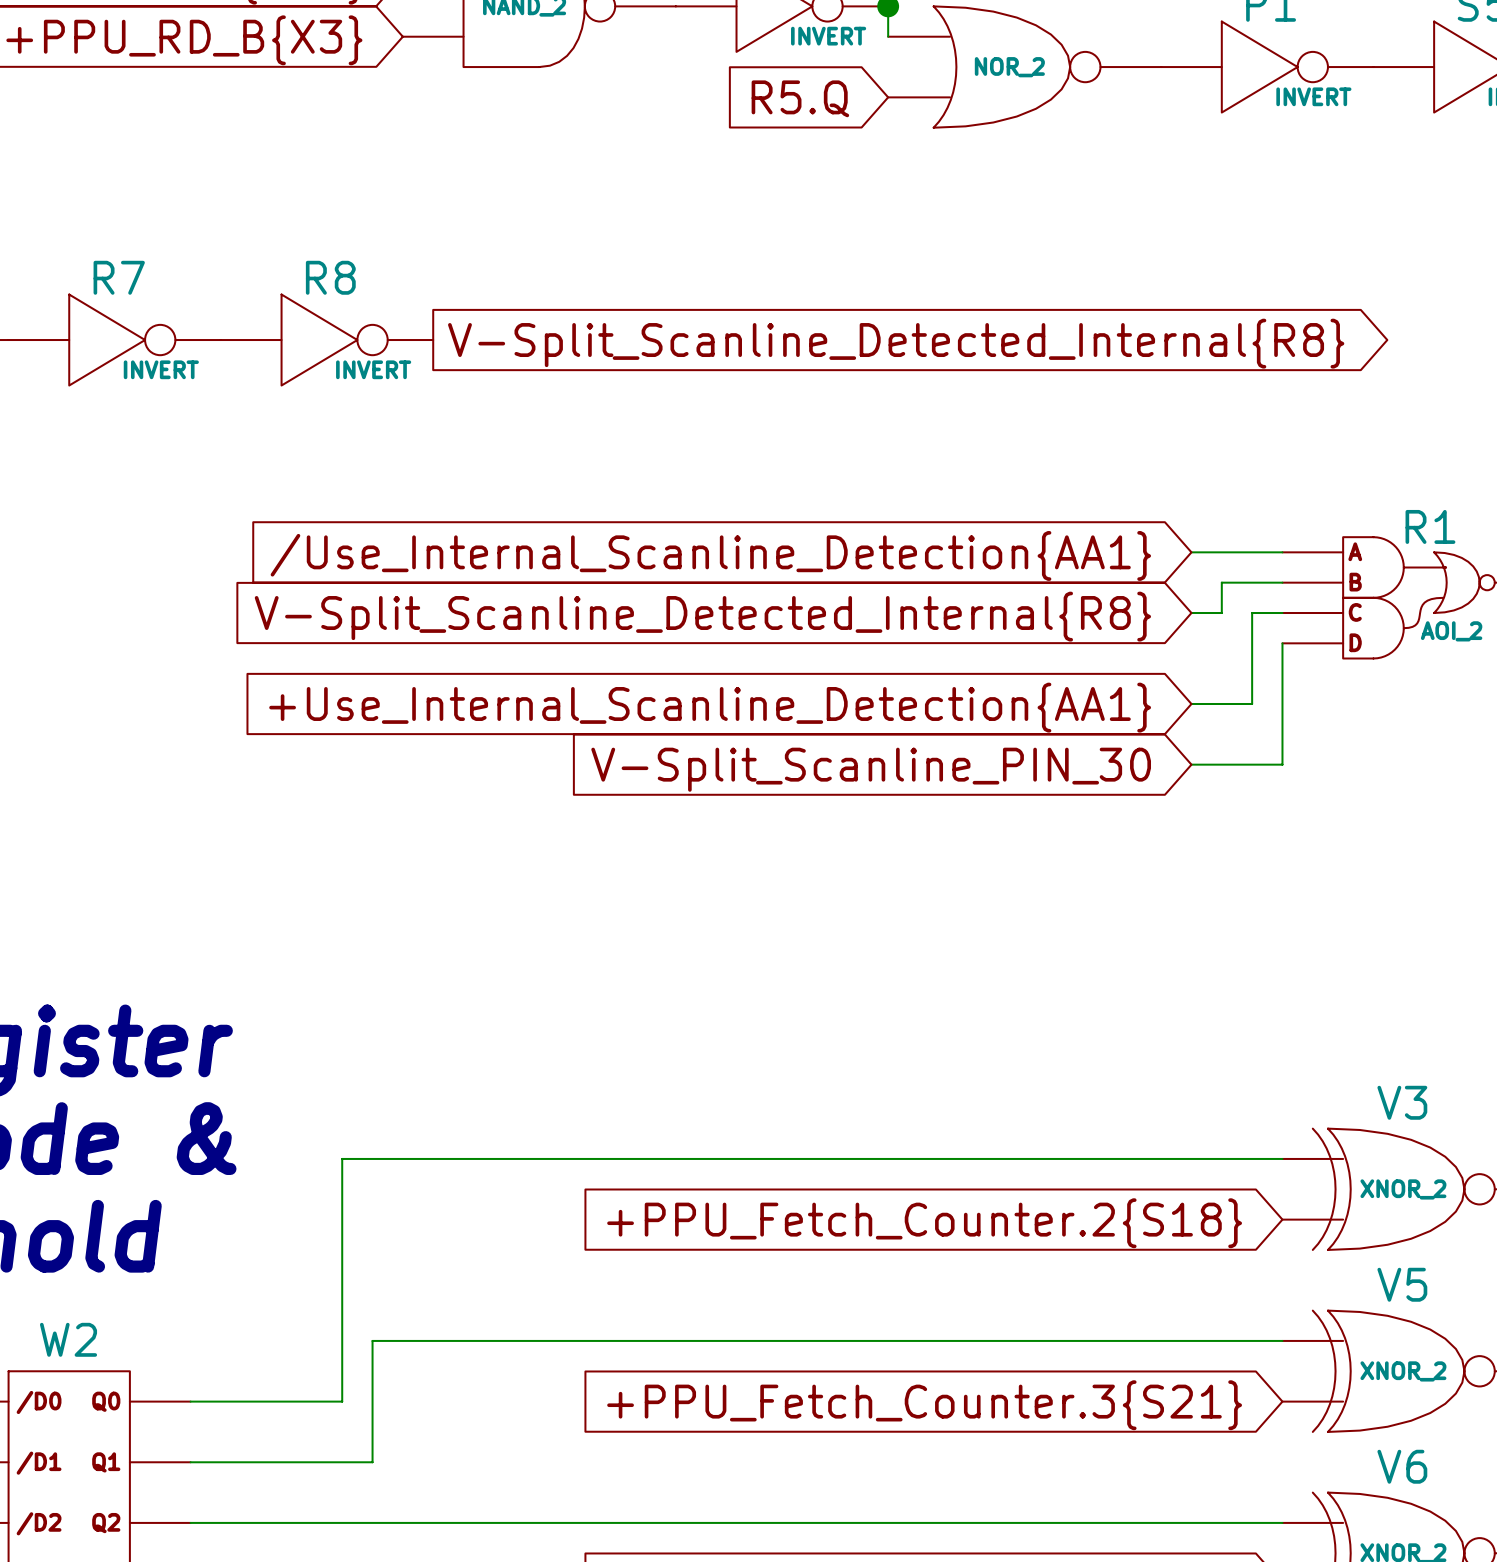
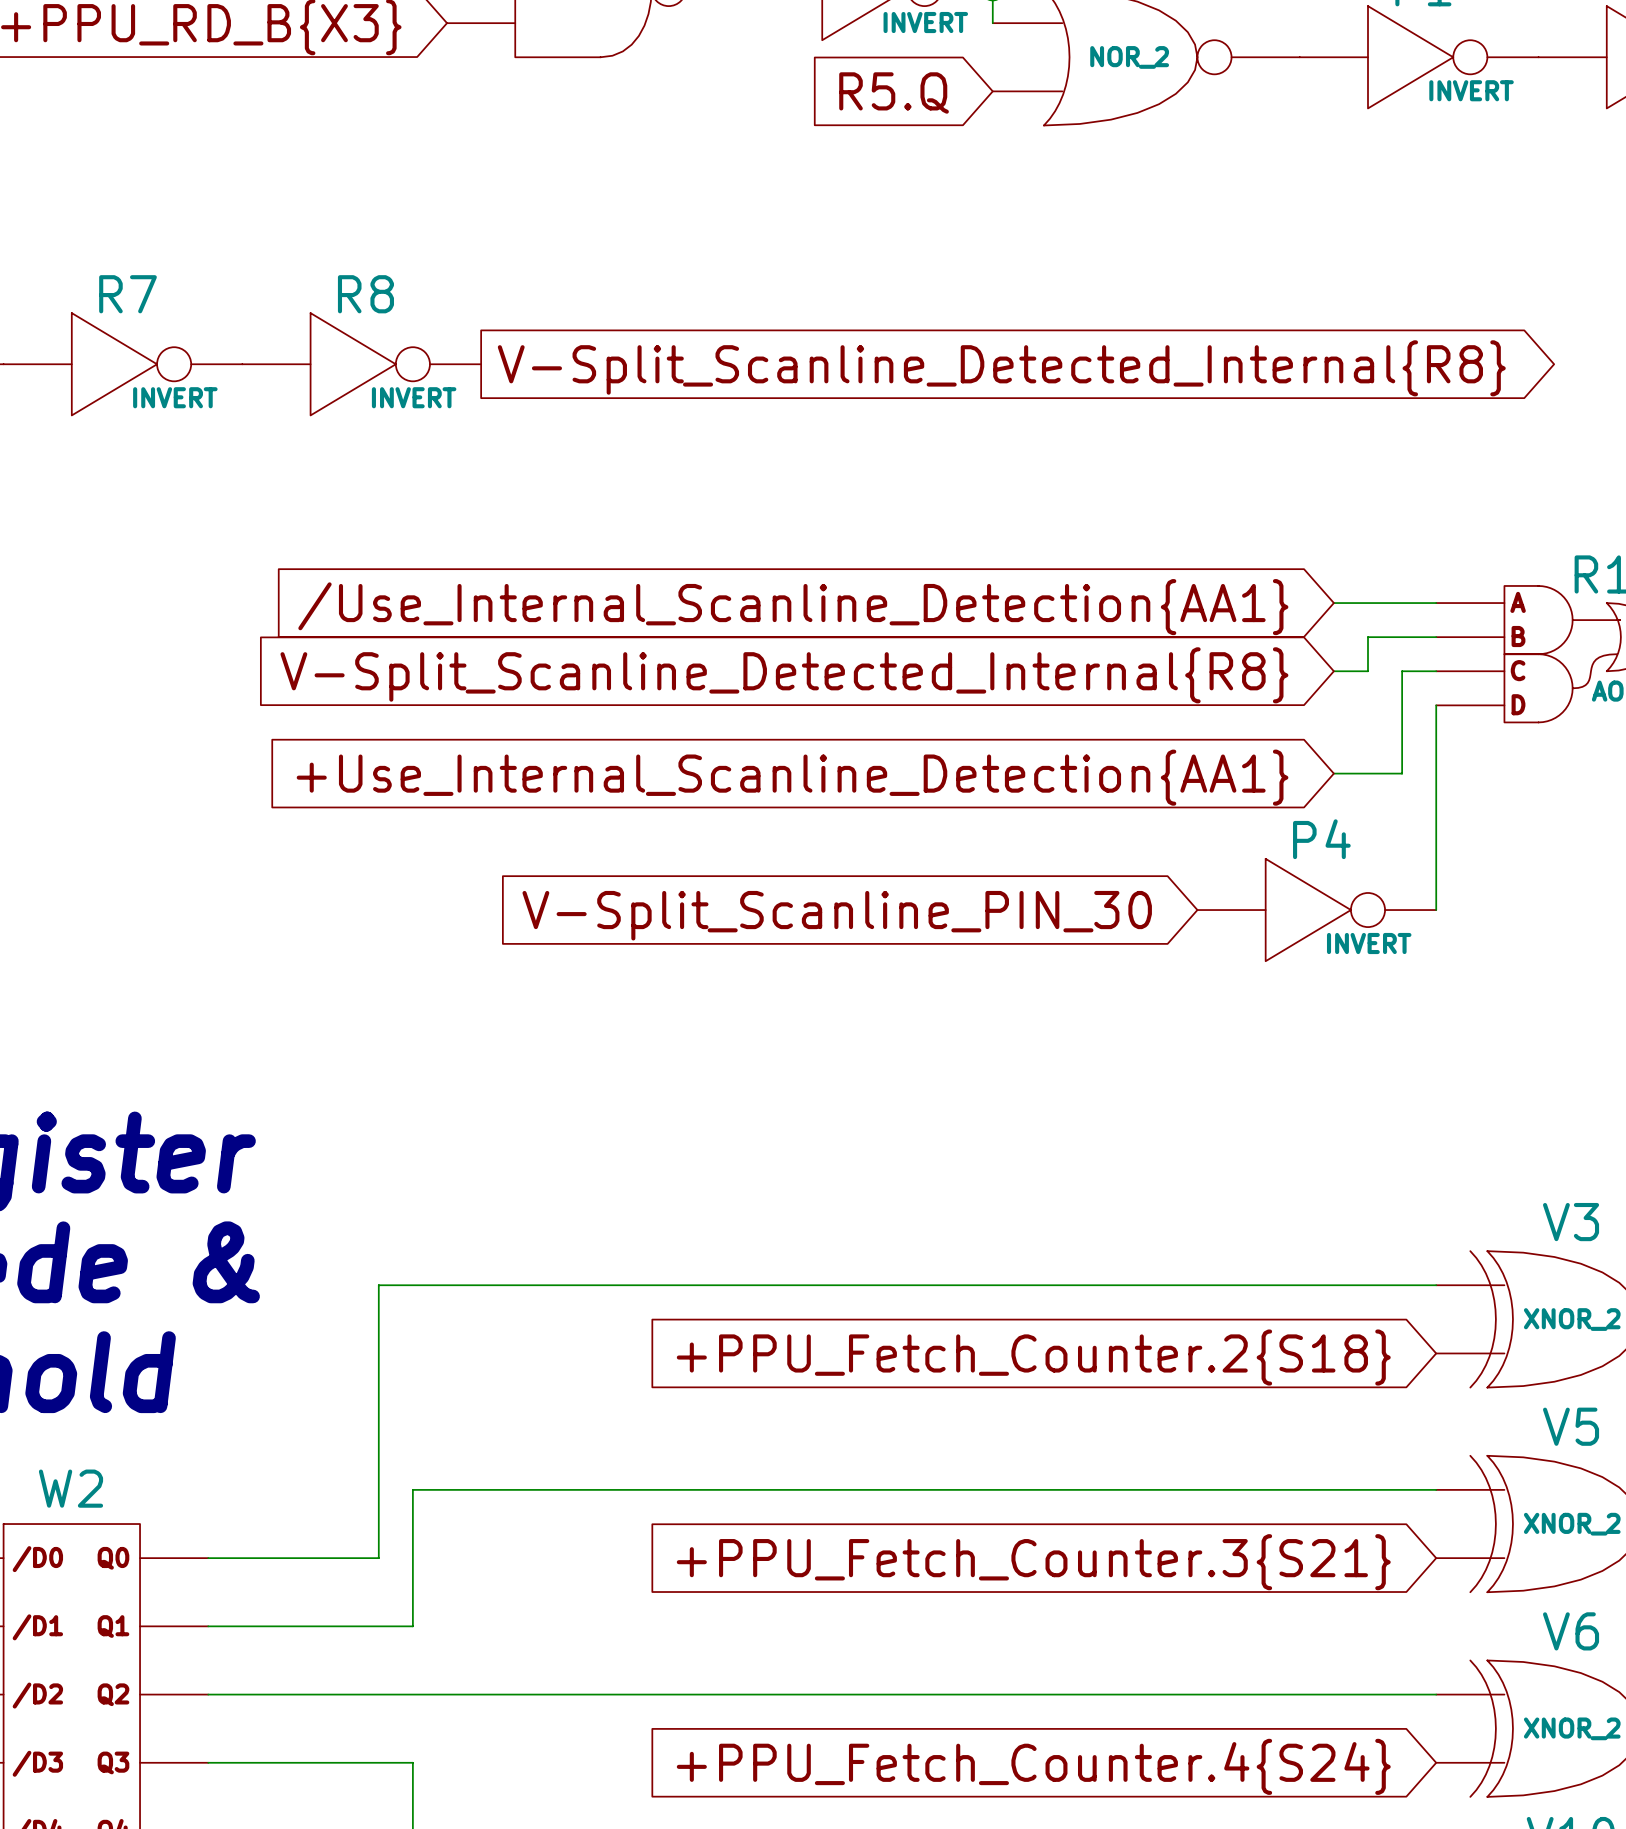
wire: (1191, 764) (1282, 764) -> (1436, 910) (1436, 841)
global label position: V-Split_Scanline_PIN_30 (871, 769) -> V-Split_Scanline_PIN_30 (837, 915)
P4: none -> INVERT (1316, 910)

